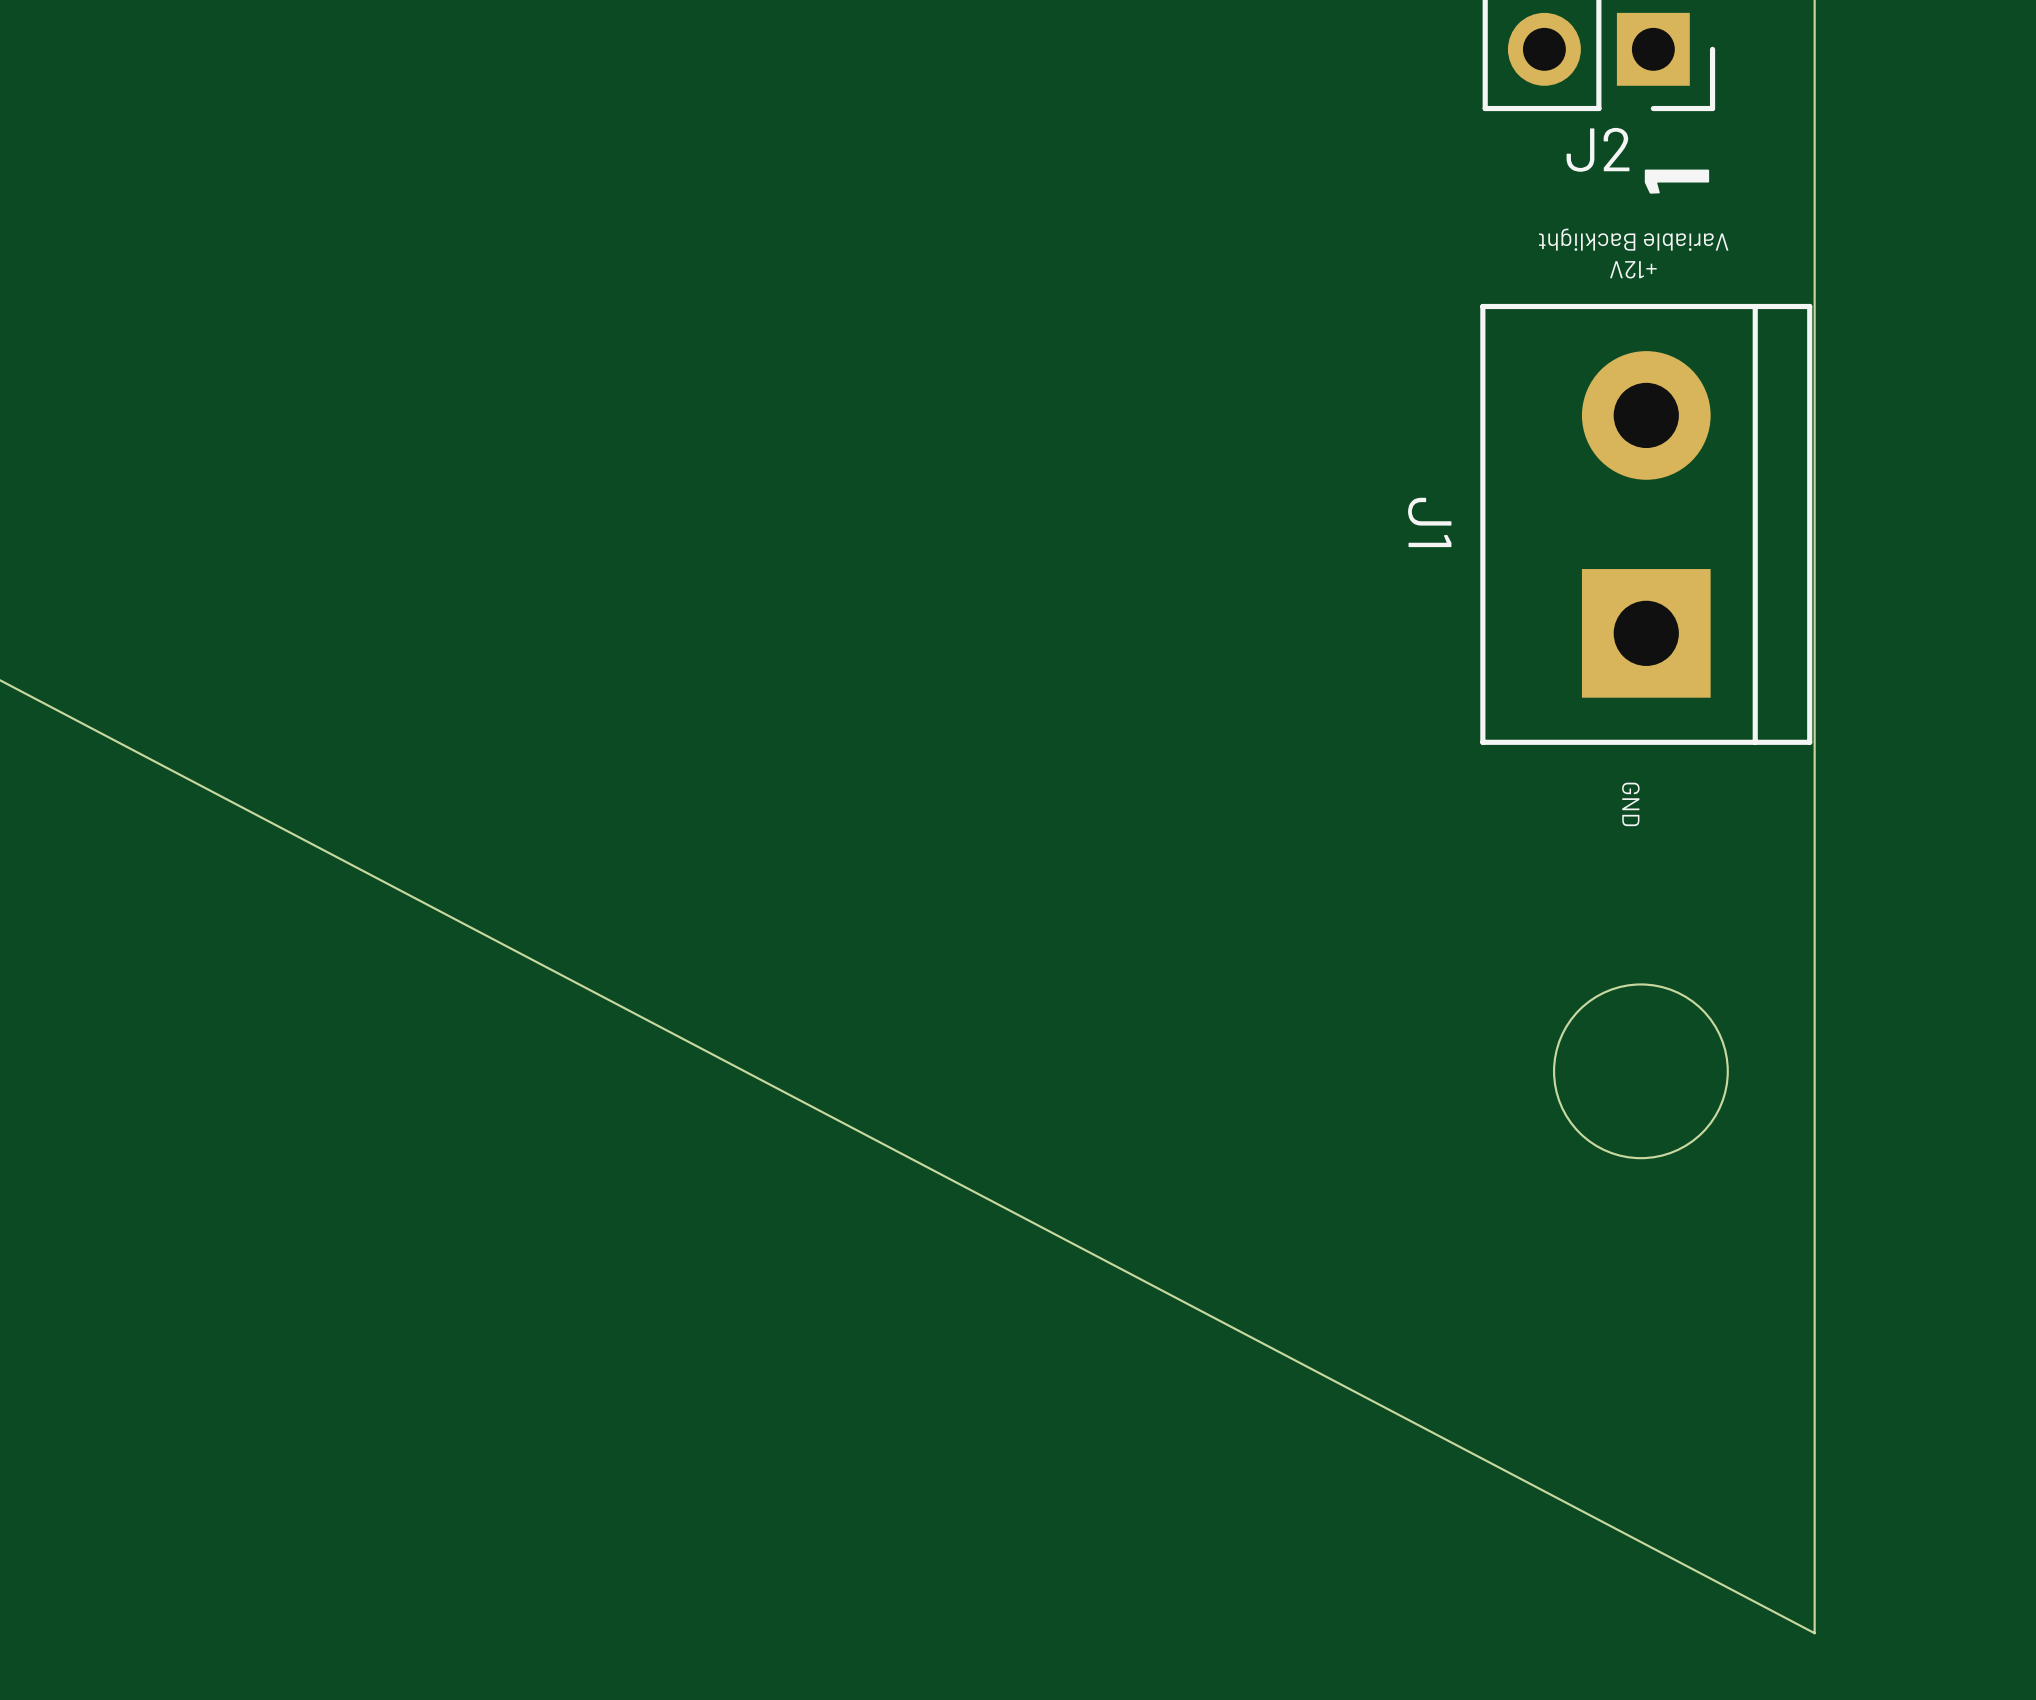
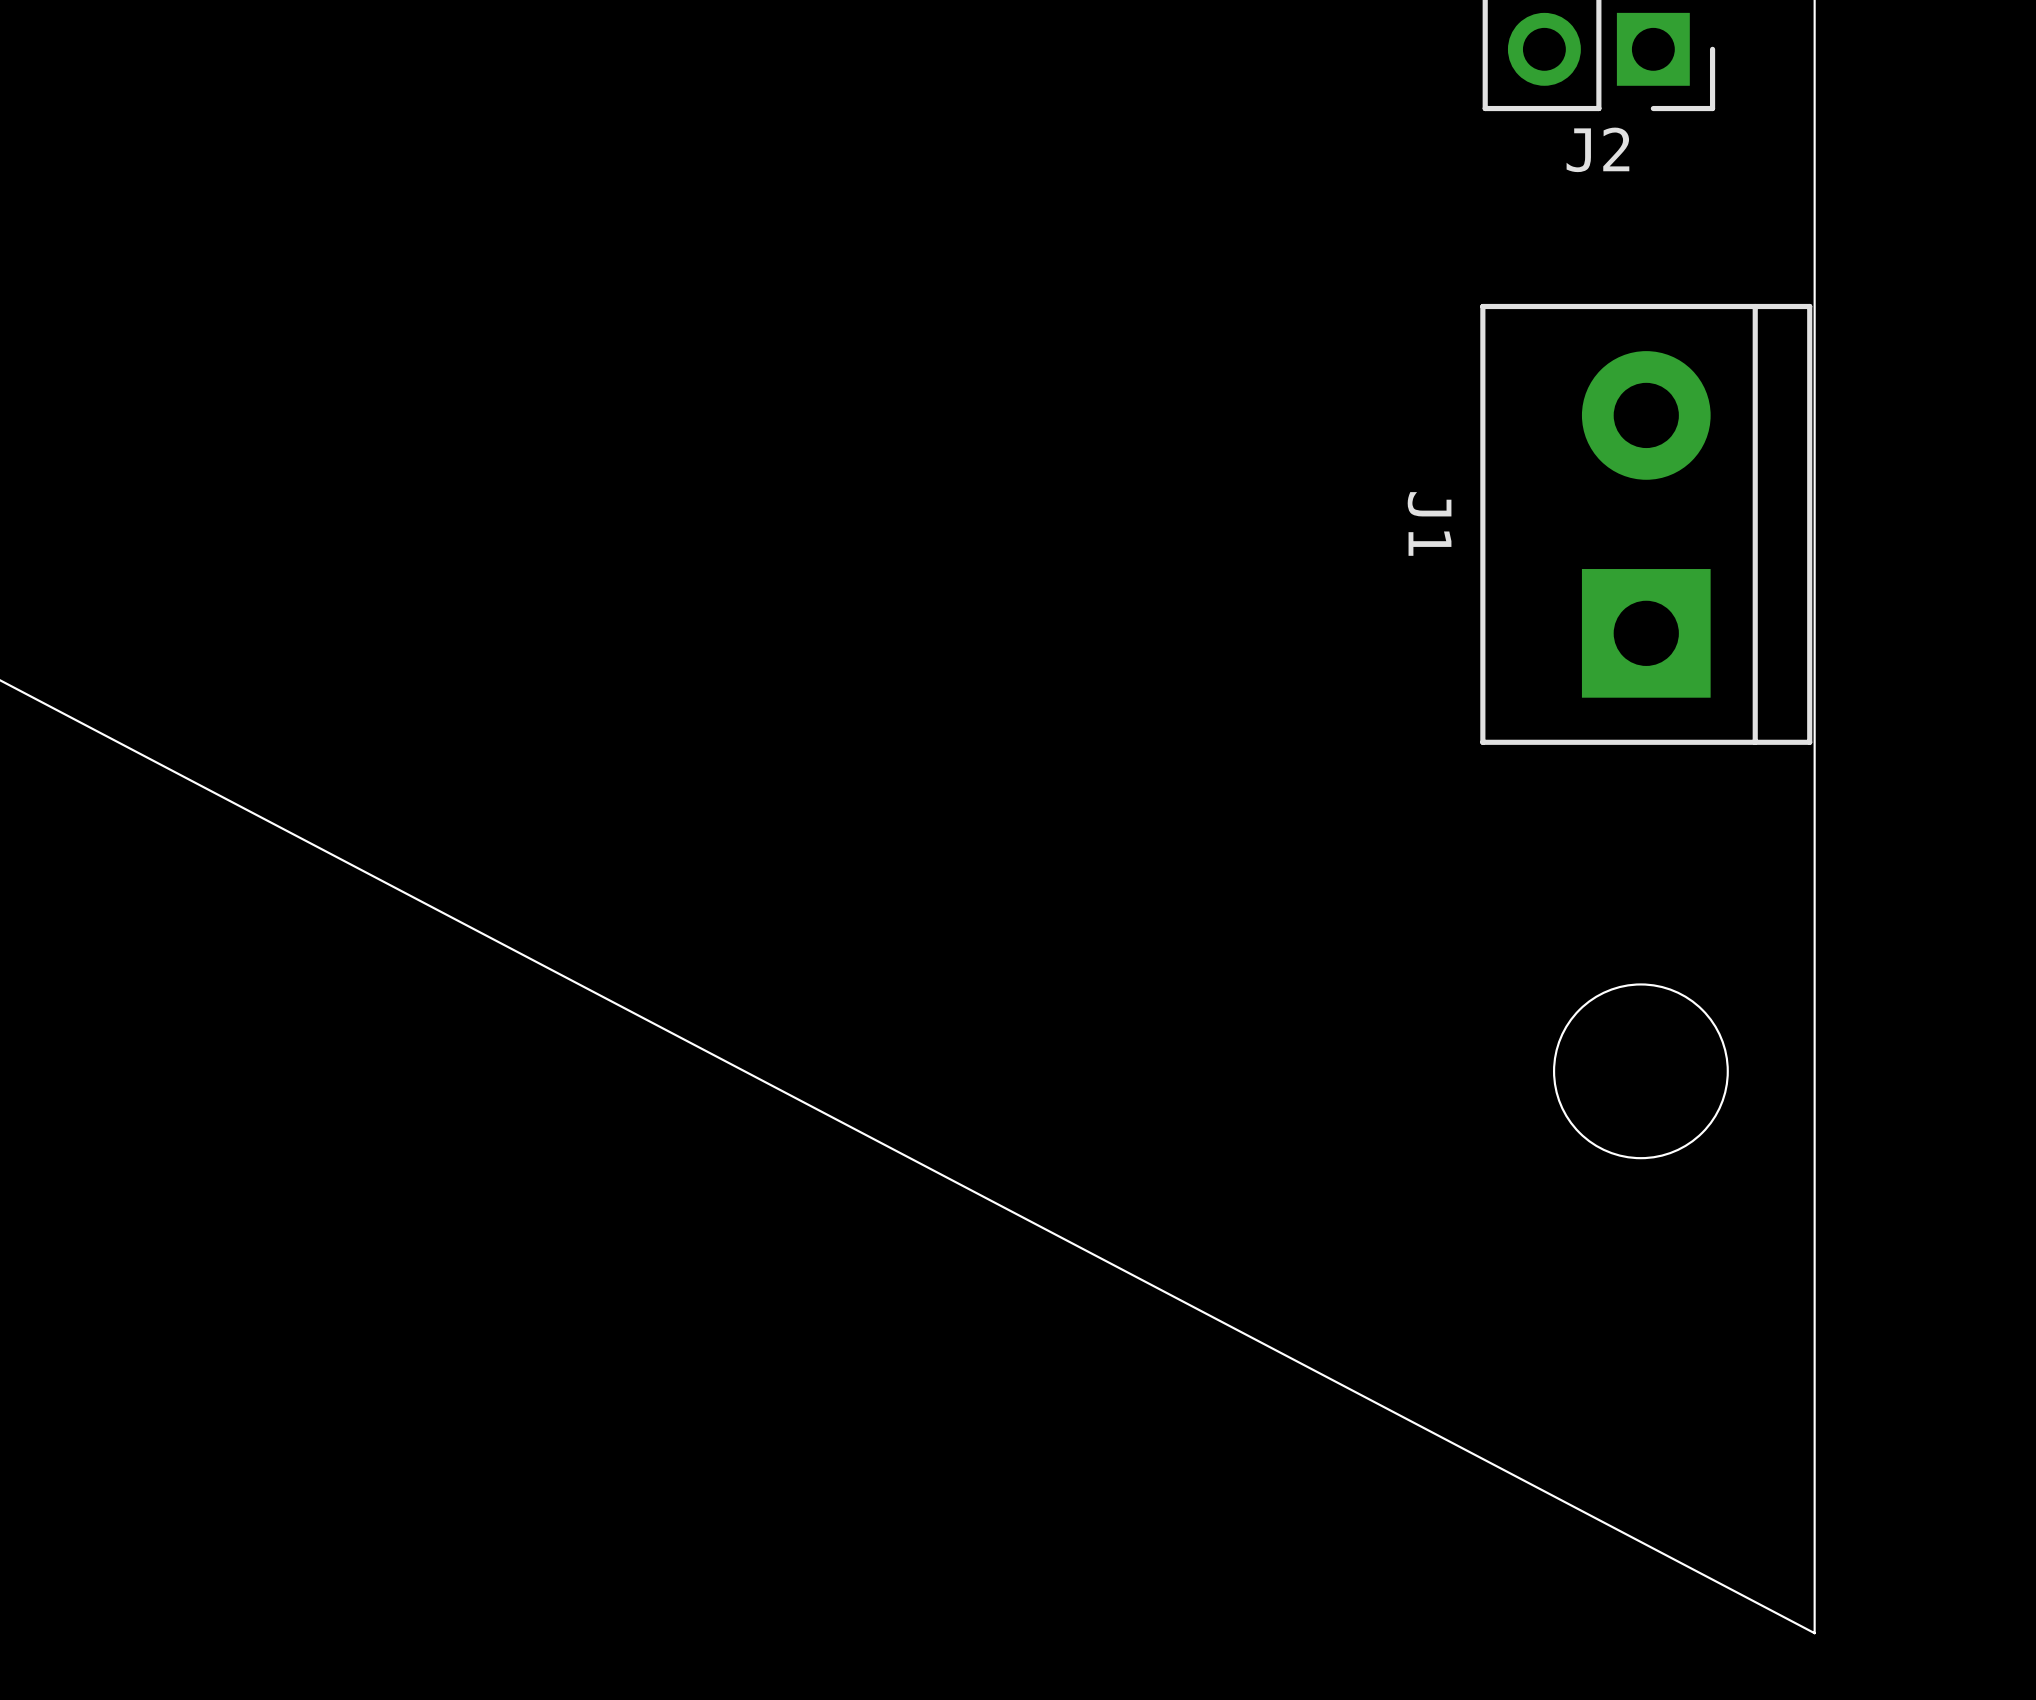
text: 1 (1676, 181) -> none
text: Variable Backlight (1633, 239) -> none
text: +12V (1633, 269) -> none
text: GND (1630, 804) -> none

